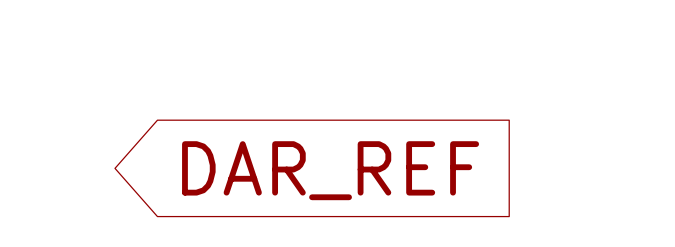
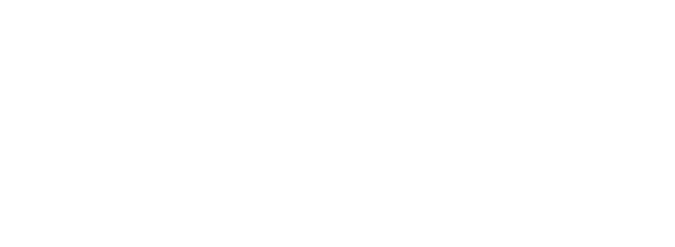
global label: DAR_REF (330, 170) -> none

